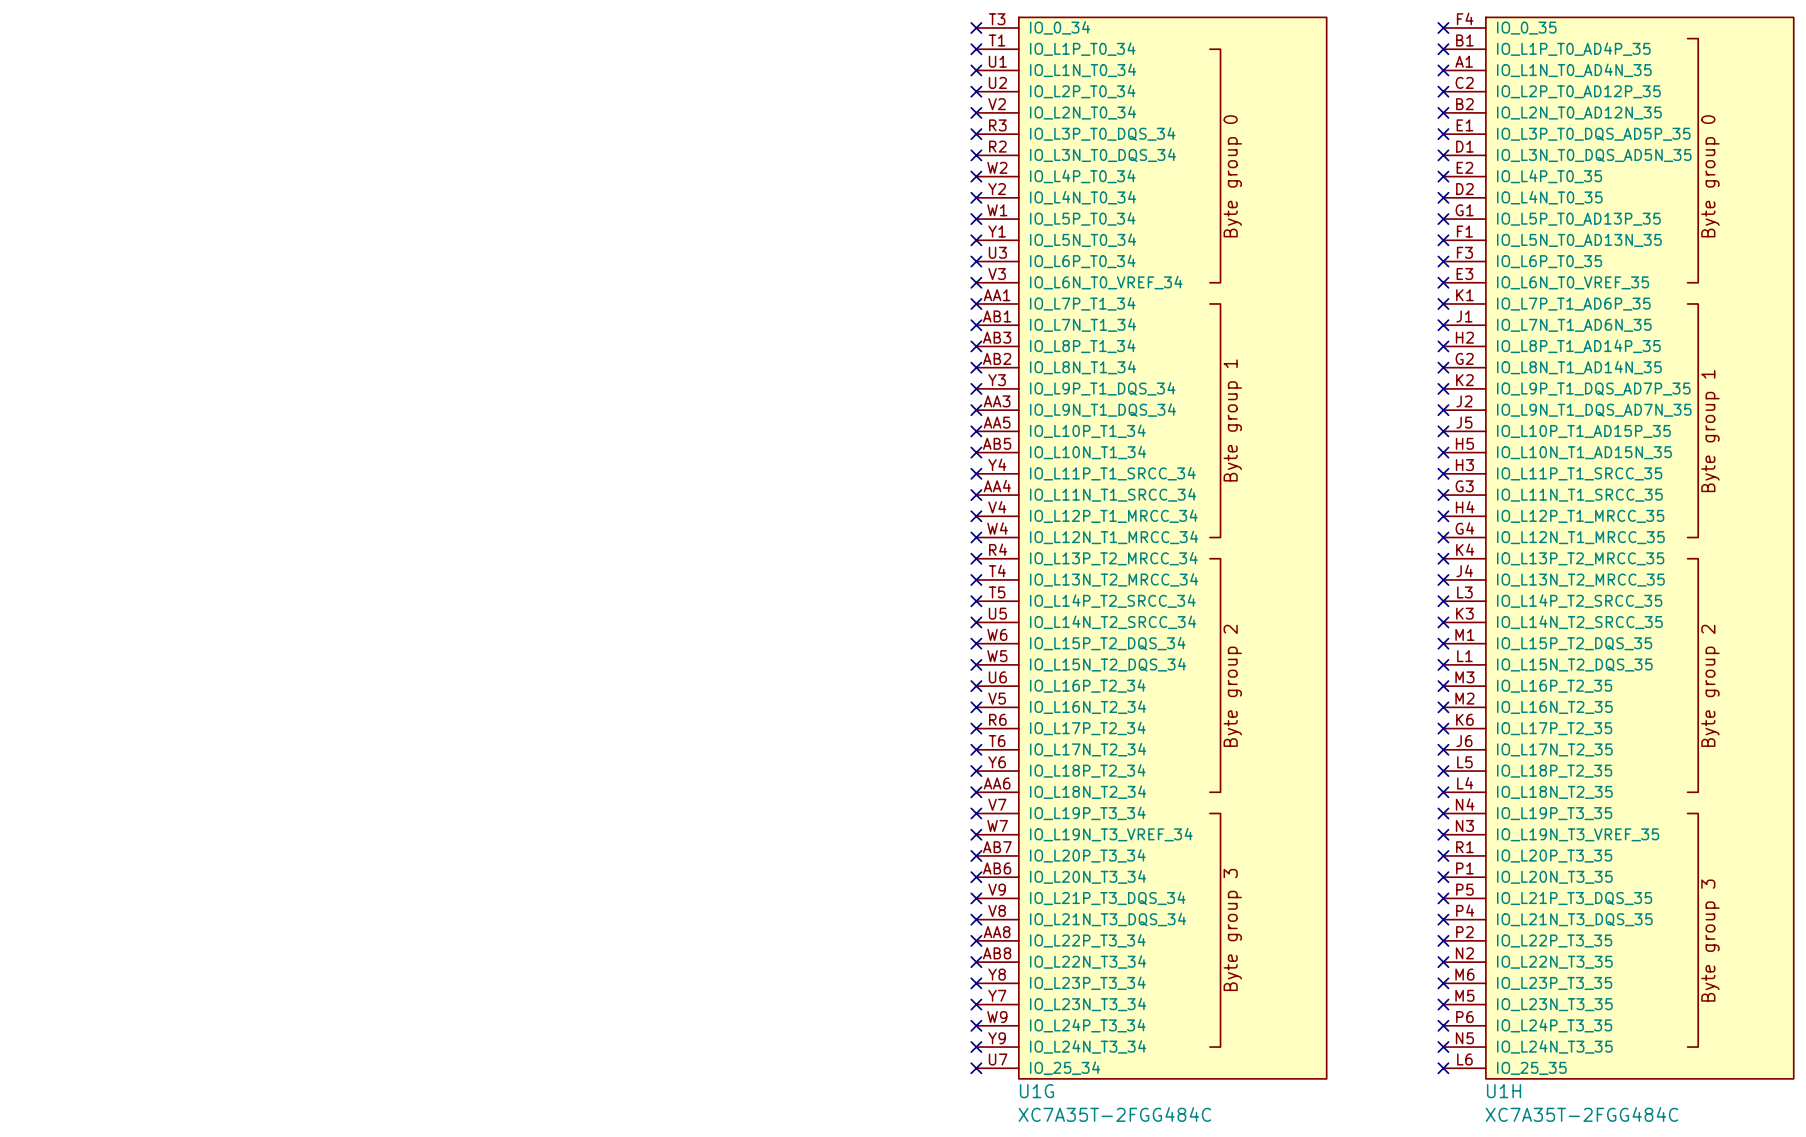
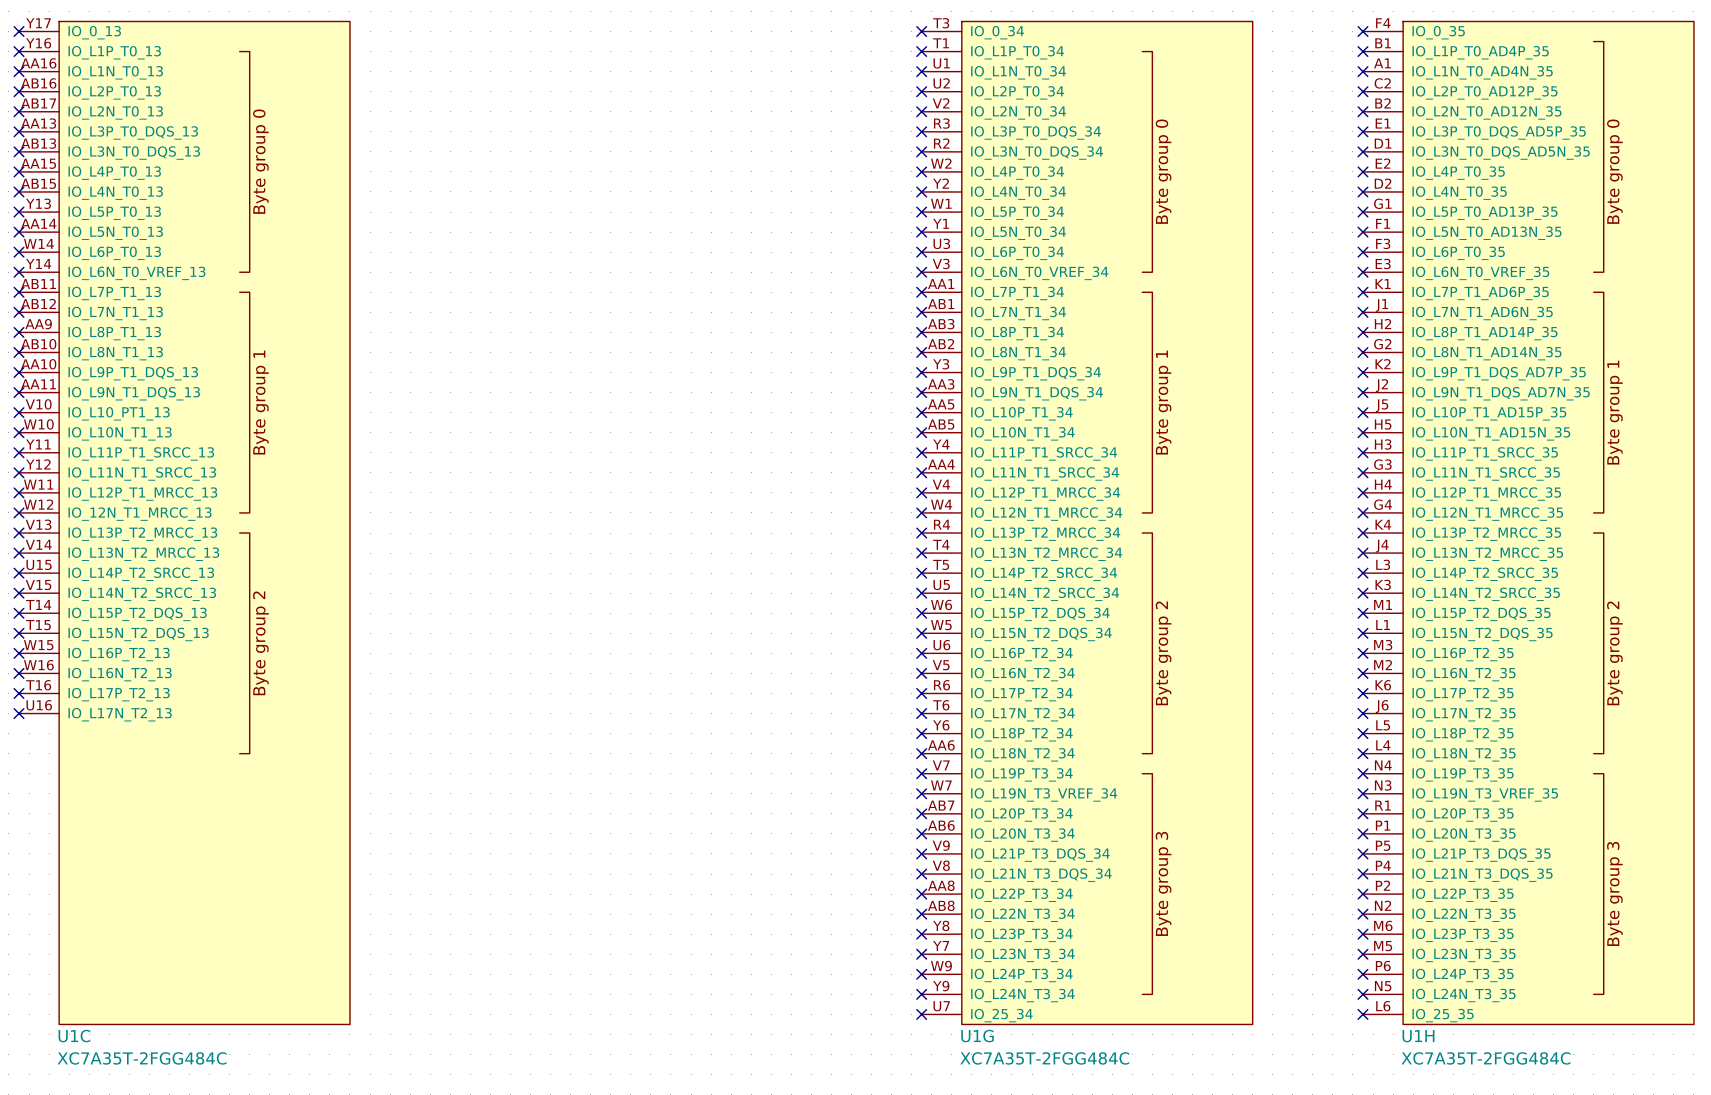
no-connect mark: none -> (19, 31)
no-connect mark: none -> (19, 51)
no-connect mark: none -> (19, 71)
no-connect mark: none -> (19, 91)
no-connect mark: none -> (19, 111)
no-connect mark: none -> (19, 131)
no-connect mark: none -> (19, 151)
no-connect mark: none -> (19, 171)
no-connect mark: none -> (19, 191)
no-connect mark: none -> (19, 212)
no-connect mark: none -> (19, 232)
no-connect mark: none -> (19, 252)
no-connect mark: none -> (19, 272)
no-connect mark: none -> (19, 292)
no-connect mark: none -> (19, 312)
no-connect mark: none -> (19, 332)
no-connect mark: none -> (19, 352)
no-connect mark: none -> (19, 372)
no-connect mark: none -> (19, 392)
no-connect mark: none -> (19, 412)
no-connect mark: none -> (19, 432)
no-connect mark: none -> (19, 452)
no-connect mark: none -> (19, 472)
no-connect mark: none -> (19, 492)
no-connect mark: none -> (19, 512)
U1C: none -> XC7A35T-2FGG484C (184, 522)
no-connect mark: none -> (19, 533)
no-connect mark: none -> (19, 553)
no-connect mark: none -> (19, 573)
no-connect mark: none -> (19, 593)
no-connect mark: none -> (19, 613)
no-connect mark: none -> (19, 633)
no-connect mark: none -> (19, 653)
no-connect mark: none -> (19, 673)
no-connect mark: none -> (19, 693)
no-connect mark: none -> (19, 713)

